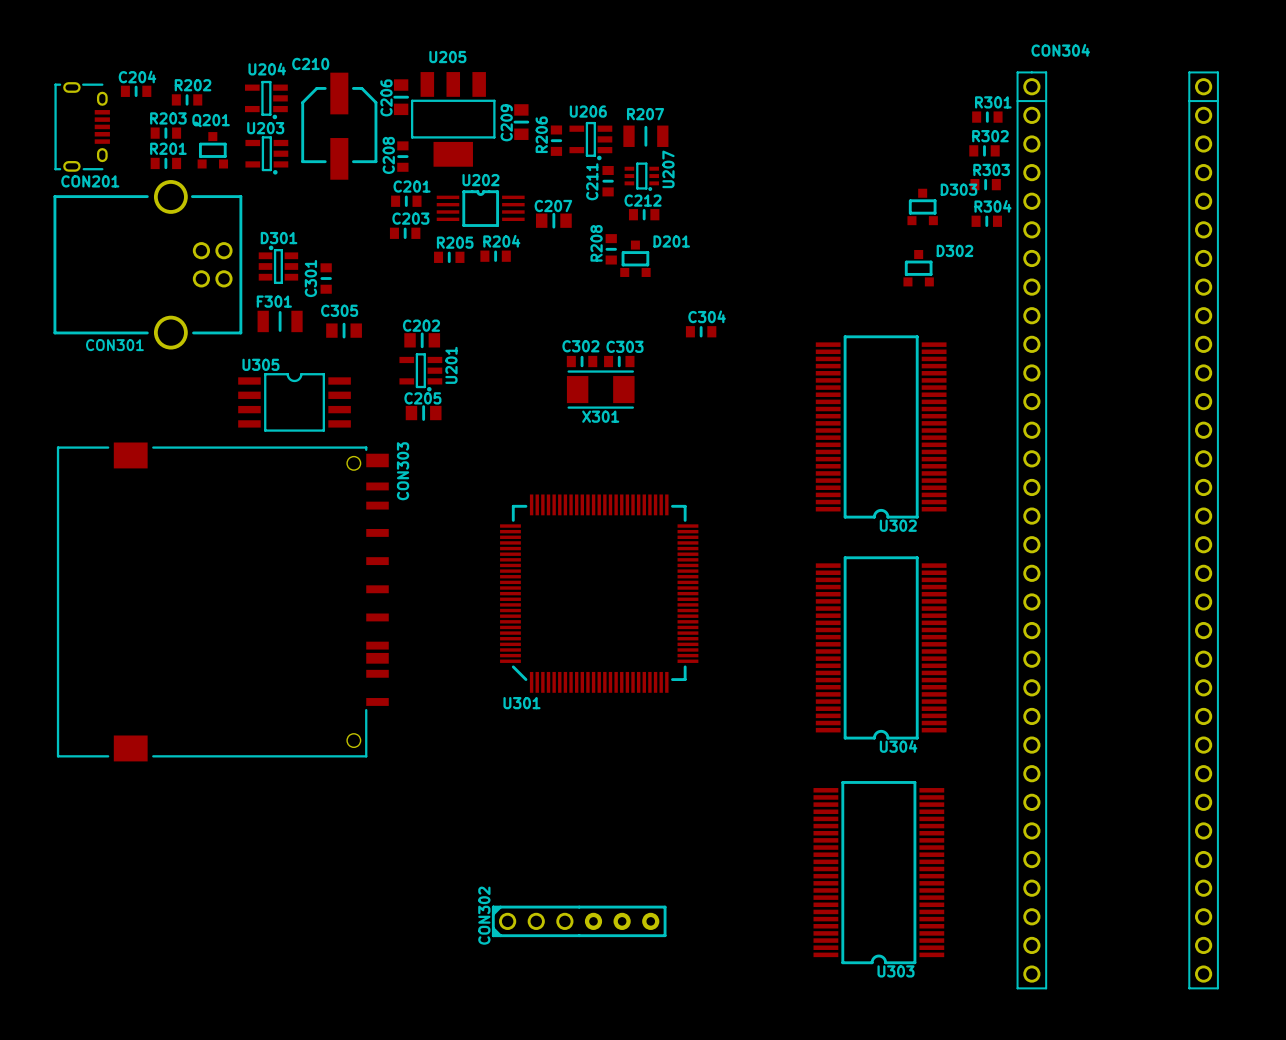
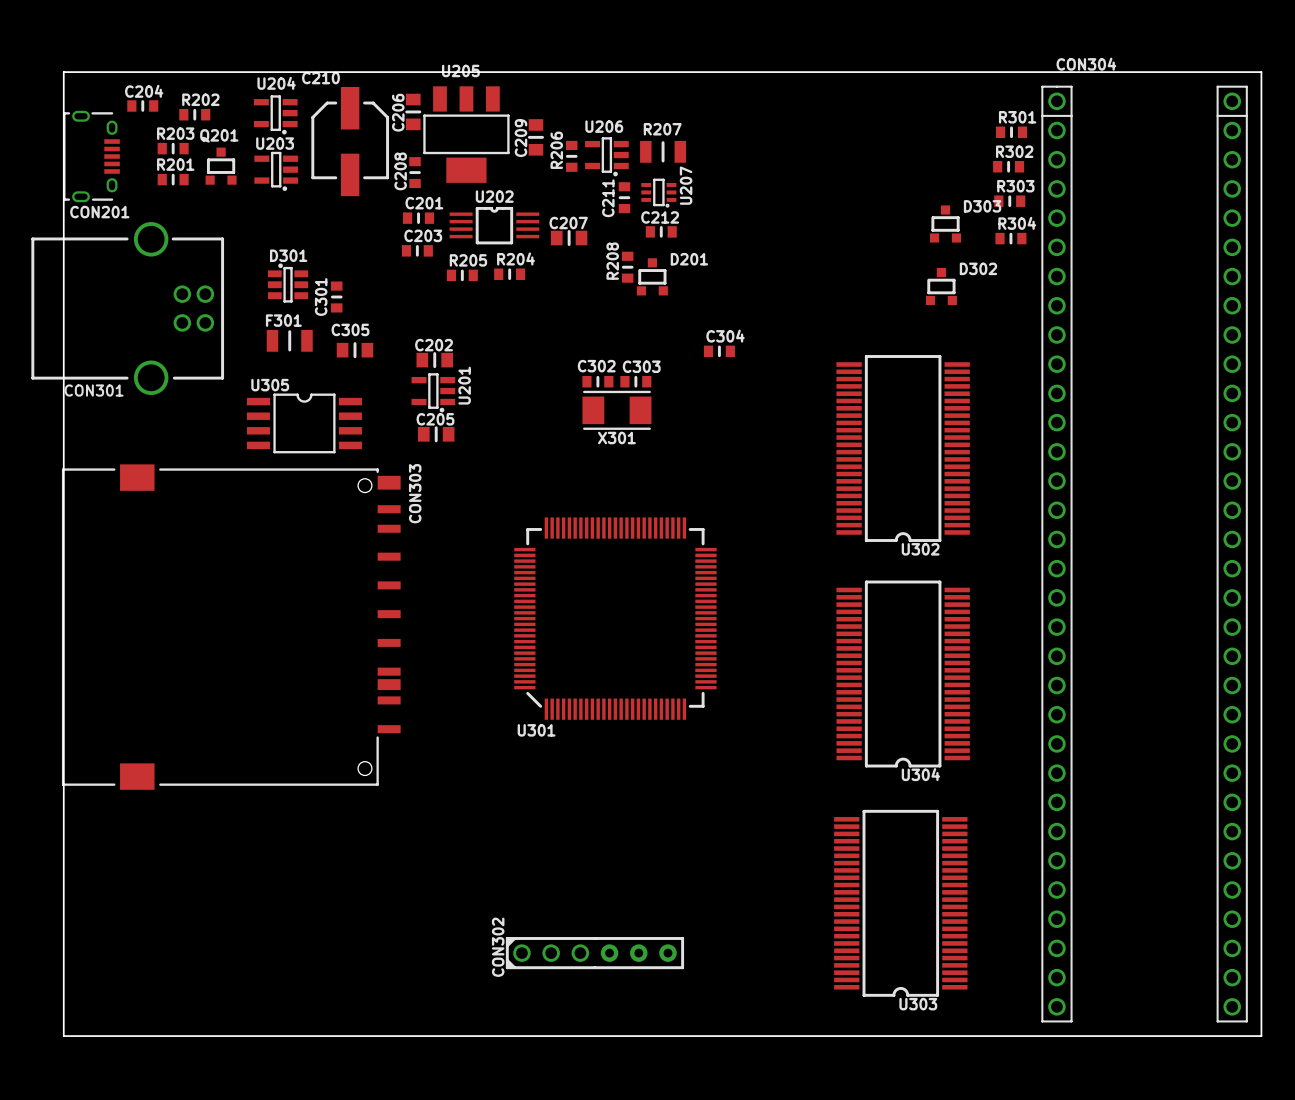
board edge: none -> (63, 72) (1261, 72) (1261, 1036) (63, 1036) (63, 72)
CON201 position: (82, 126) -> (91, 156)
CON301 position: (147, 264) -> (127, 308)

